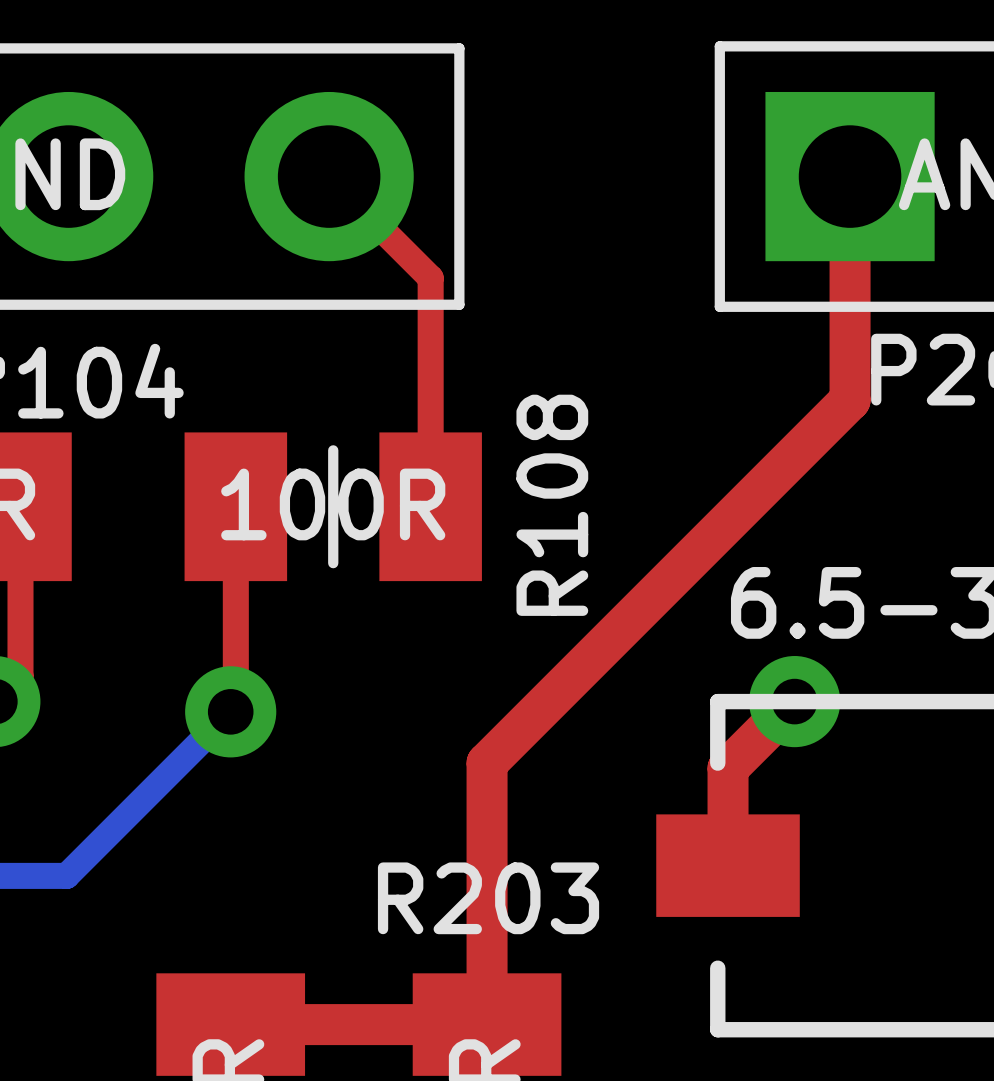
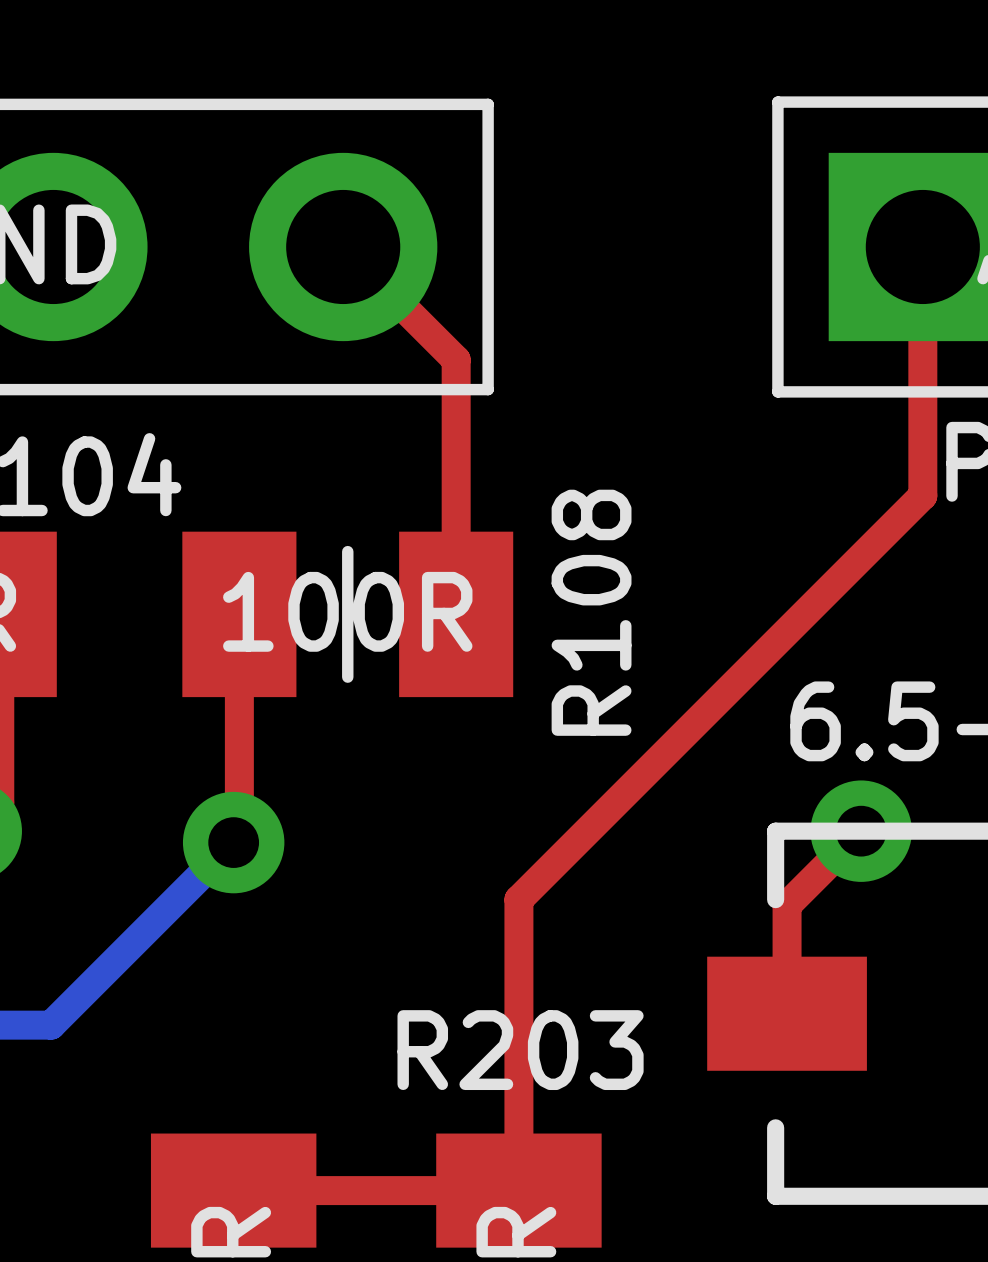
top track width: thick (850, 176) (850, 400) (487, 763) (487, 1024) (230, 1024) -> thin (922, 246) (922, 495) (518, 899) (518, 1190) (233, 1190)
top track width: thick (794, 701) (728, 768) (728, 865) -> thin (861, 831) (787, 905) (787, 1013)

